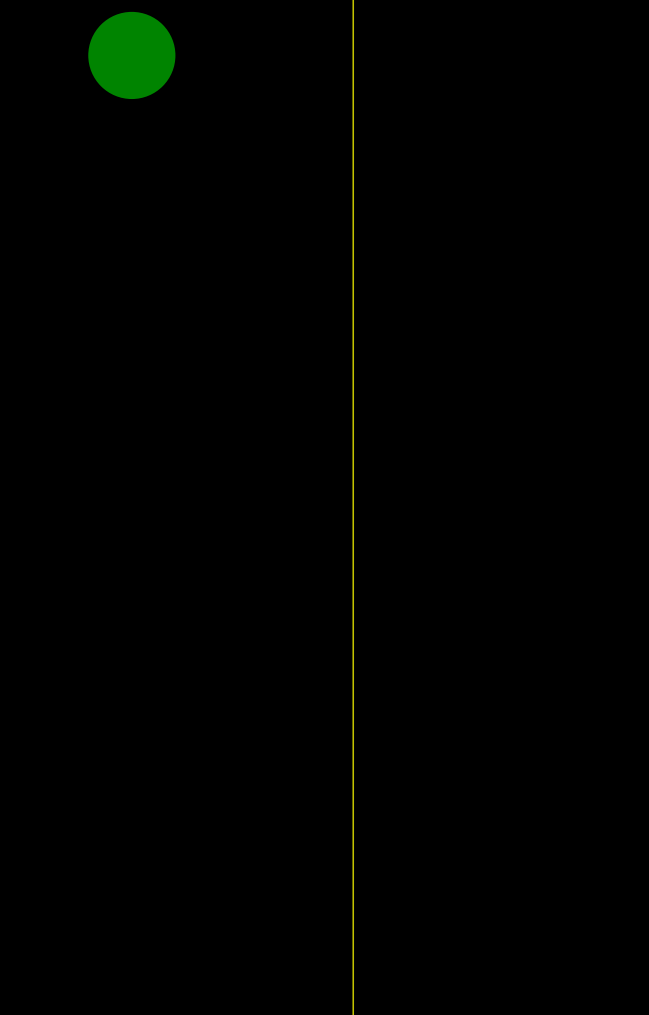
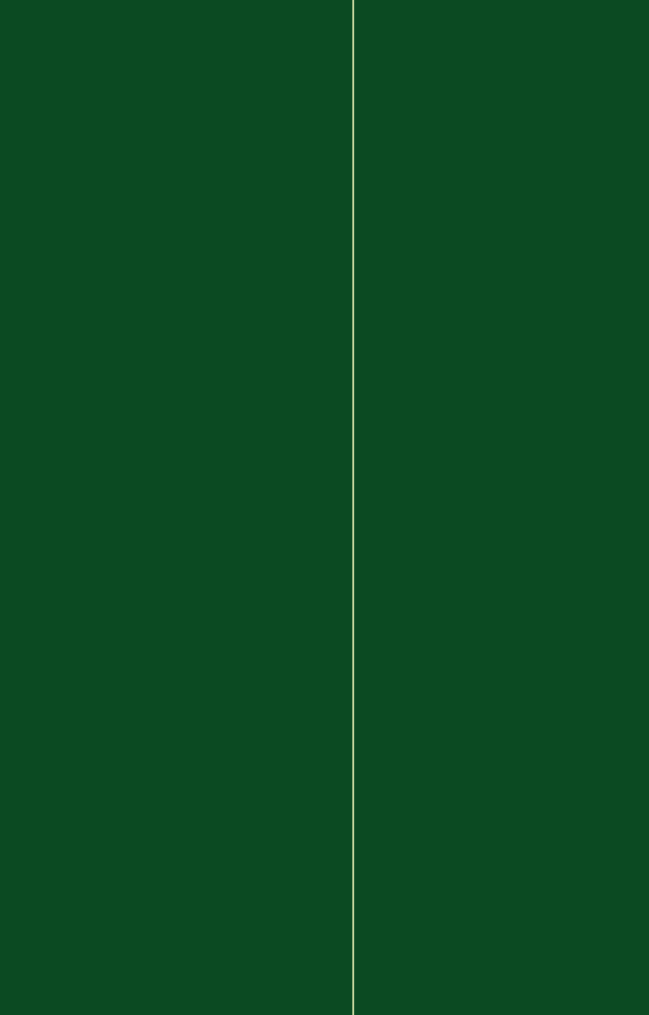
part: (131, 55) -> none

